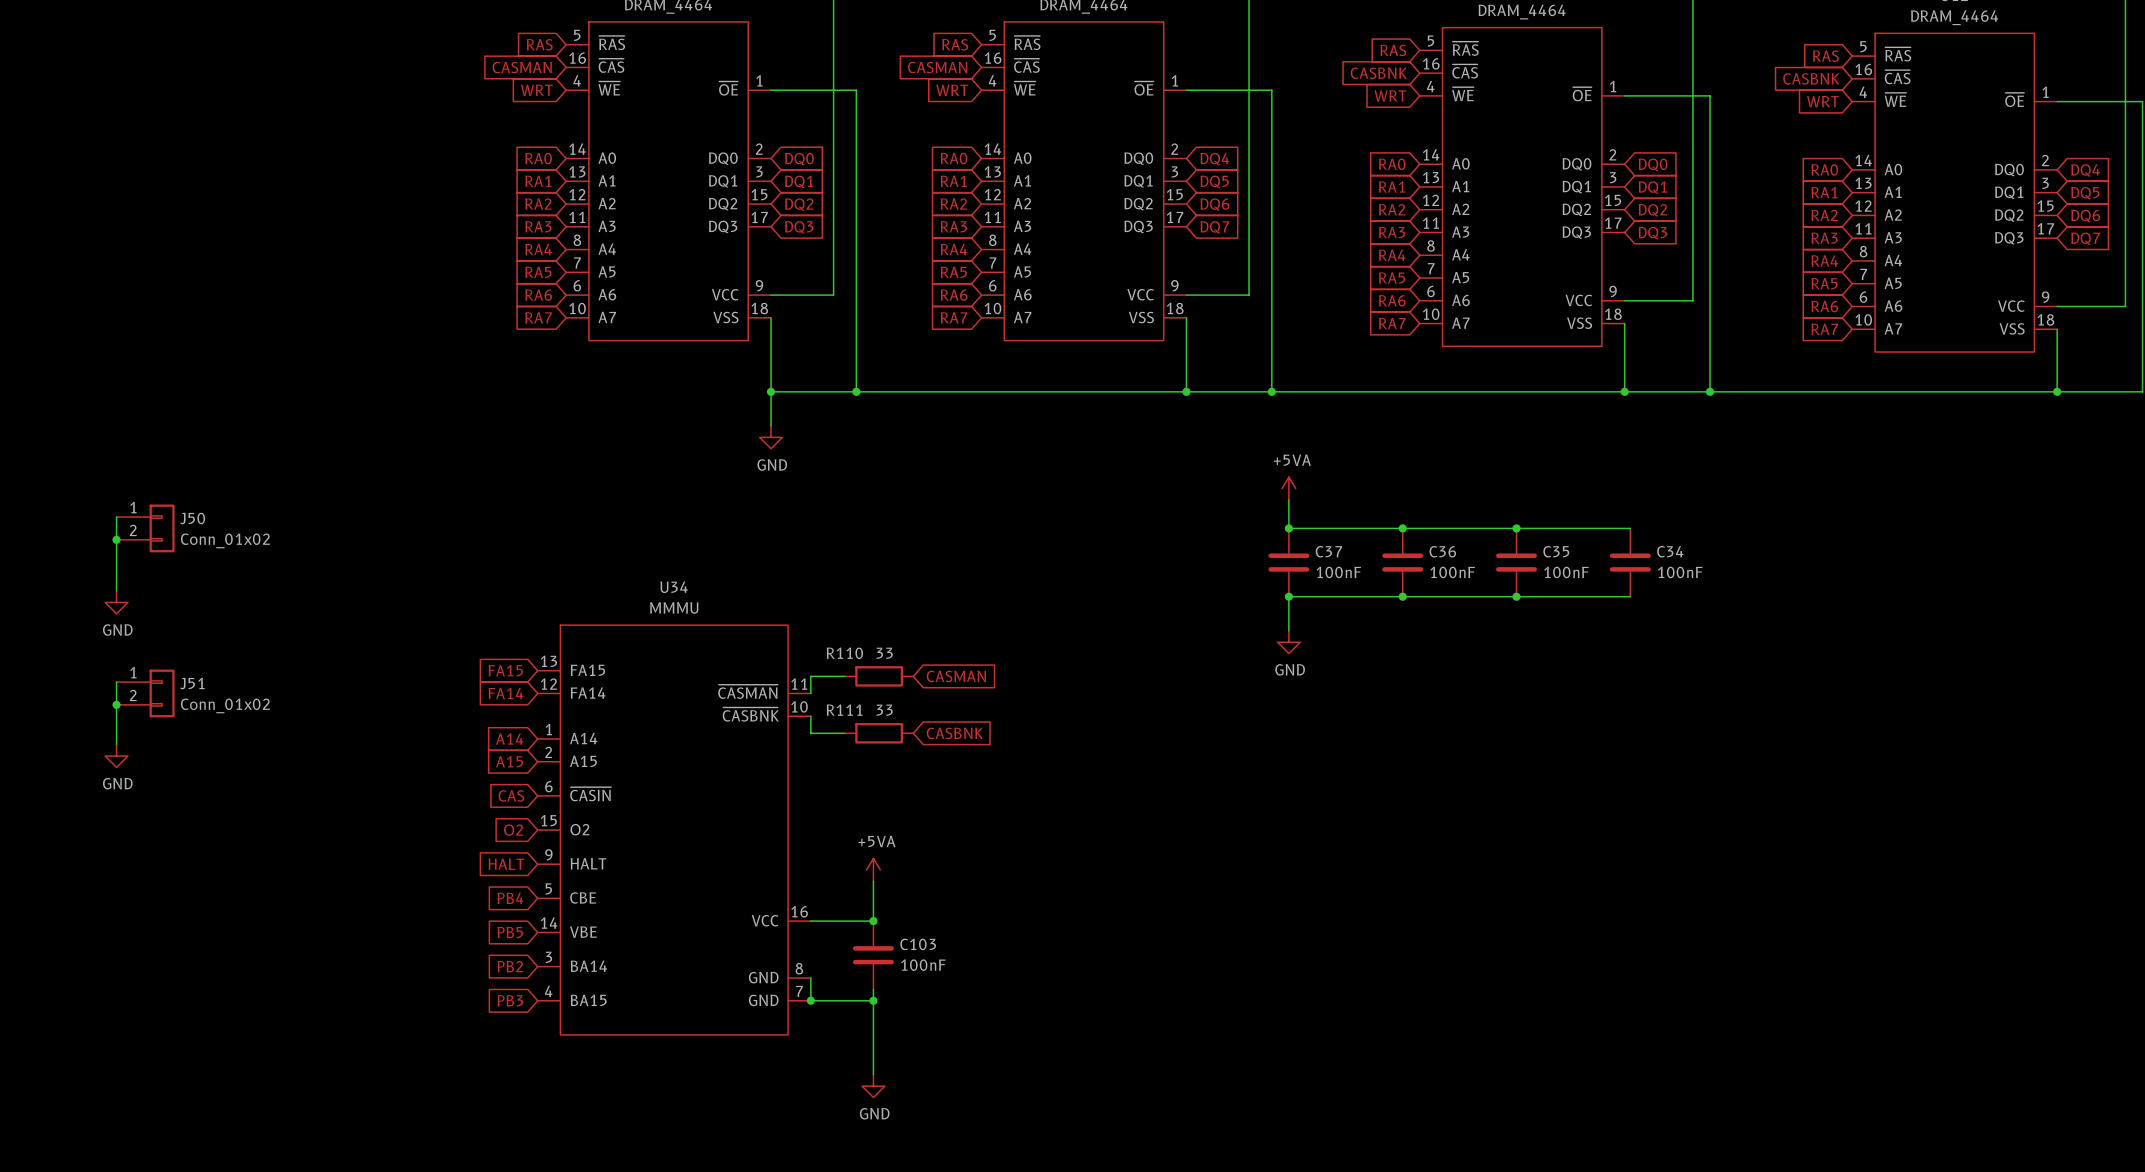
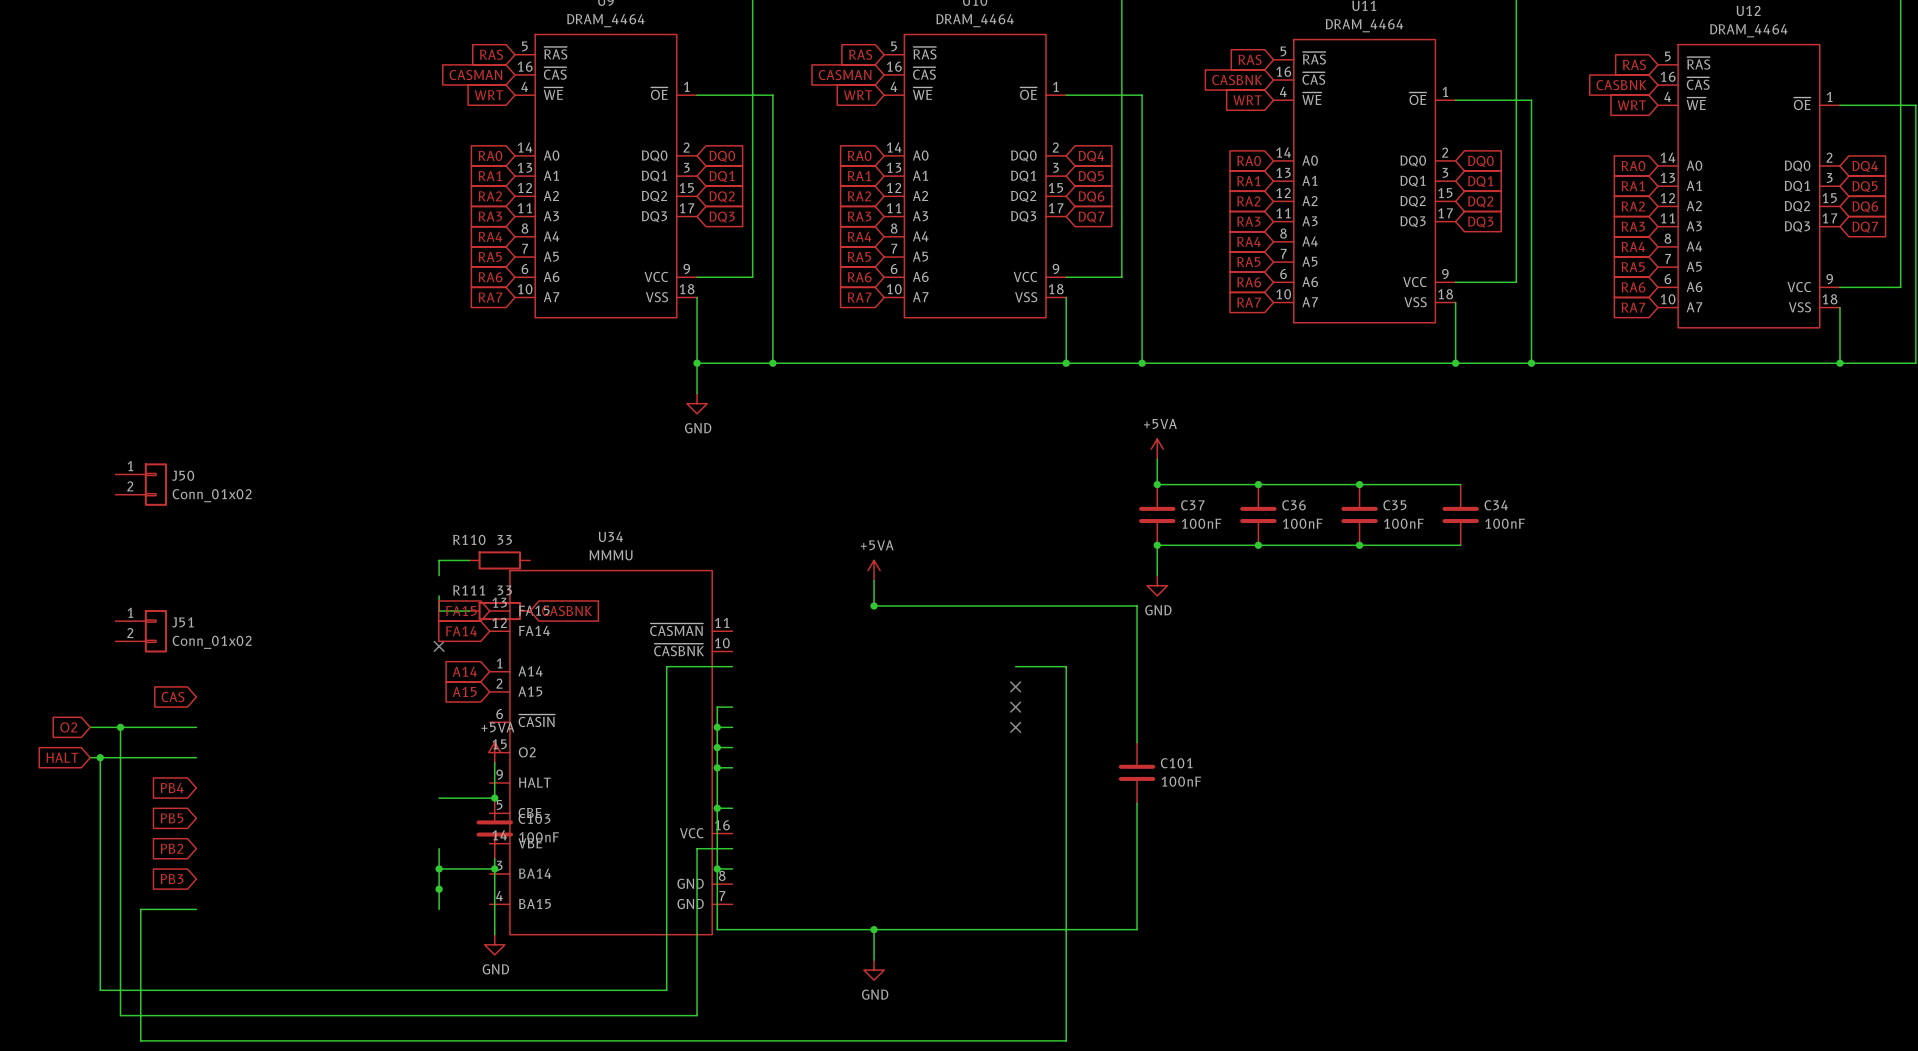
wire: (116, 517) (116, 591) -> none
junction: (116, 539) -> none
power symbol: GND (116, 602) -> none
wire: none -> (469, 560) (439, 560) (439, 575)
power symbol: none -> +5VA (874, 570)
wire: none -> (874, 580) (874, 605) (1137, 605) (1137, 742)
wire: none -> (439, 595) (439, 611) (469, 611)
junction: none -> (874, 605)
global label: none -> CASBNK (567, 611)
wire: (844, 676) (810, 676) (810, 693) -> none
R110 position: (879, 676) -> (499, 560)
global label: CASMAN (956, 676) -> none
wire: (116, 682) (116, 744) -> none
junction: (116, 704) -> none
no-connect mark: none -> (439, 646)
wire: (810, 716) (810, 733) (844, 733) -> none
wire: none -> (732, 666) (666, 666) (666, 990) (100, 990) (100, 757)
R111 position: (879, 733) -> (499, 611)
global label: CASBNK (954, 733) -> none
wire: none -> (1015, 666) (1066, 666) (1066, 1040) (140, 1040) (140, 909) (196, 909)
power symbol: GND (116, 756) -> none
no-connect mark: none -> (1015, 686)
global label: none -> CAS (173, 697)
wire: none -> (732, 707) (717, 707) (717, 929) (1137, 929) (1137, 803)
no-connect mark: none -> (1015, 707)
global label: CAS (511, 795) -> none
global label: none -> O2 (68, 727)
wire: none -> (90, 727) (196, 727)
wire: none -> (120, 727) (120, 1015) (697, 1015) (697, 848) (732, 848)
junction: none -> (120, 727)
wire: none -> (717, 727) (732, 727)
junction: none -> (717, 727)
no-connect mark: none -> (1015, 727)
wire: none -> (717, 747) (732, 747)
junction: none -> (717, 747)
global label: O2 (513, 830) -> none
power symbol: none -> +5VA (494, 752)
global label: none -> HALT (62, 757)
wire: none -> (90, 757) (196, 757)
junction: none -> (100, 757)
wire: none -> (494, 762) (494, 798) (439, 798)
wire: none -> (717, 767) (732, 767)
junction: none -> (717, 767)
C101: none -> 100nF (1137, 772)
global label: HALT (506, 864) -> none
global label: none -> PB4 (172, 788)
power symbol: +5VA (873, 869) -> none
junction: none -> (494, 798)
wire: (873, 881) (873, 921) (810, 921) -> none
wire: none -> (717, 808) (732, 808)
junction: none -> (717, 808)
global label: PB4 (510, 898) -> none
global label: none -> PB5 (172, 818)
junction: (873, 921) -> none
global label: PB5 (510, 932) -> none
global label: none -> PB2 (172, 848)
wire: none -> (439, 848) (439, 909)
wire: none -> (494, 858) (494, 934)
C103 position: (873, 955) -> (494, 828)
wire: none -> (439, 868) (494, 868)
junction: none -> (439, 868)
junction: none -> (494, 868)
wire: none -> (717, 868) (732, 868)
global label: PB2 (510, 966) -> none
global label: none -> PB3 (172, 879)
wire: (810, 978) (810, 1000) (873, 1000) -> none
junction: none -> (439, 889)
wire: (873, 989) (873, 1074) -> none
global label: PB3 (510, 1000) -> none
junction position: (810, 1000) -> (717, 868)
junction: (873, 1000) -> none
wire: none -> (874, 929) (874, 959)
junction: none -> (874, 929)
power symbol: none -> GND (494, 944)
power symbol position: GND (873, 1086) -> GND (874, 970)

